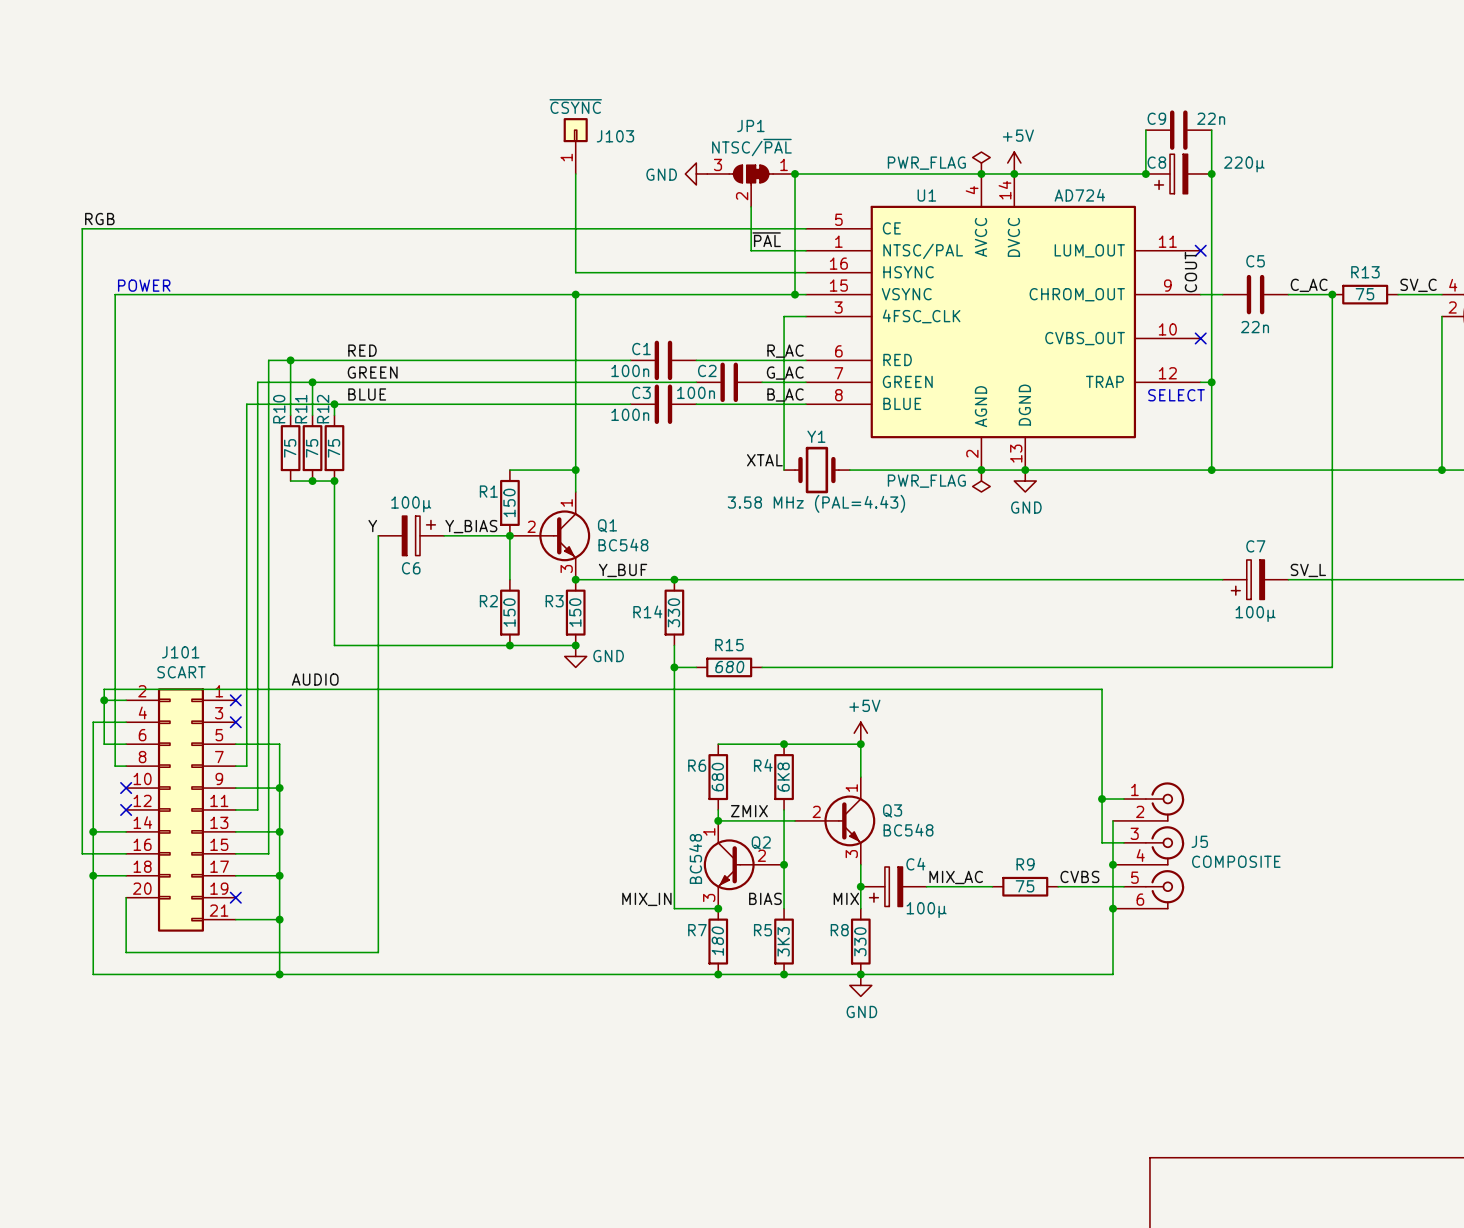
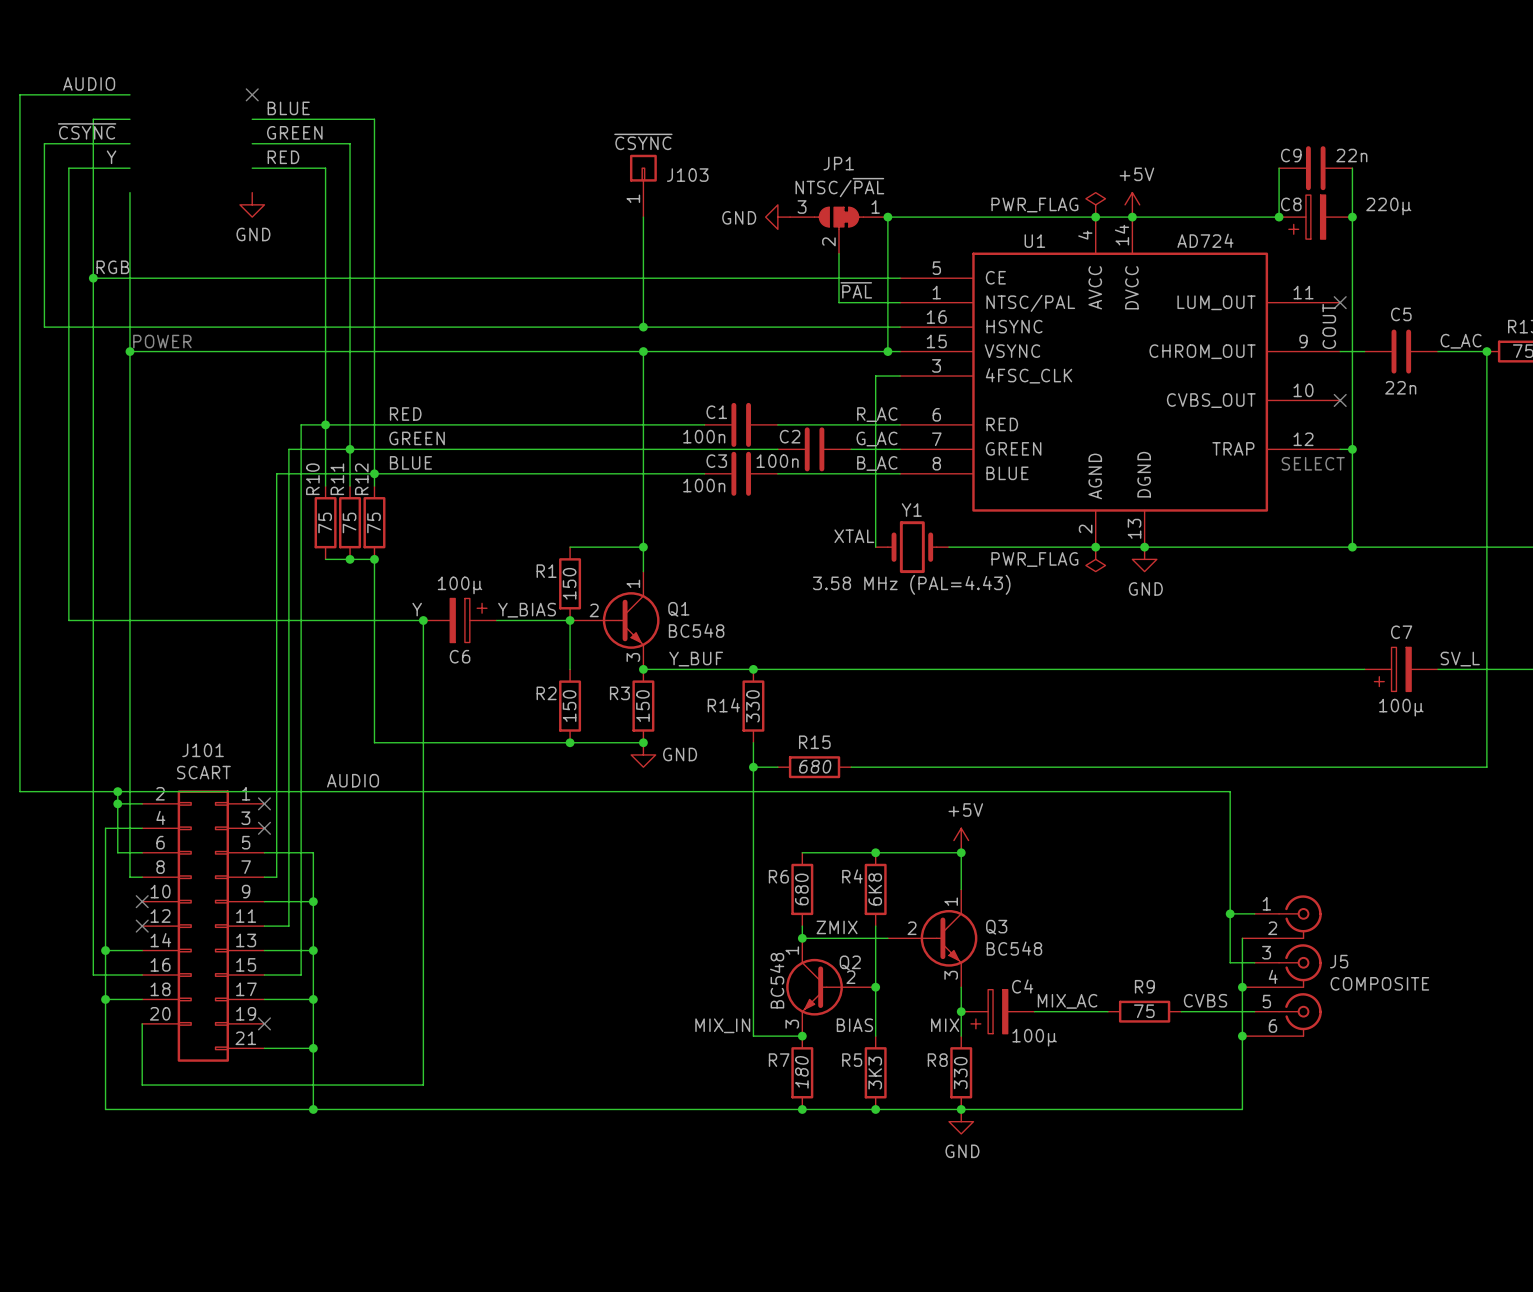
label: none -> AUDIO (89, 83)
wire: none -> (129, 94) (19, 94) (19, 791) (117, 791)
no-connect mark: none -> (252, 94)
label: none -> BLUE (288, 108)
wire: none -> (129, 119) (93, 119) (93, 278)
wire: none -> (252, 119) (374, 119) (374, 473)
label: none -> ~{CSYNC} (87, 131)
label: none -> GREEN (294, 132)
wire: none -> (129, 143) (44, 143) (44, 327) (643, 327)
wire: none -> (252, 143) (350, 143) (350, 449)
label: none -> Y (111, 157)
label: none -> RED (283, 157)
wire: none -> (129, 168) (68, 168) (68, 620) (423, 620)
wire: none -> (252, 168) (325, 168) (325, 424)
wire: none -> (129, 192) (129, 351)
power symbol: none -> GND (252, 204)
junction: none -> (93, 278)
junction: none -> (643, 327)
junction: none -> (129, 351)
junction: none -> (423, 620)
junction: none -> (117, 791)

